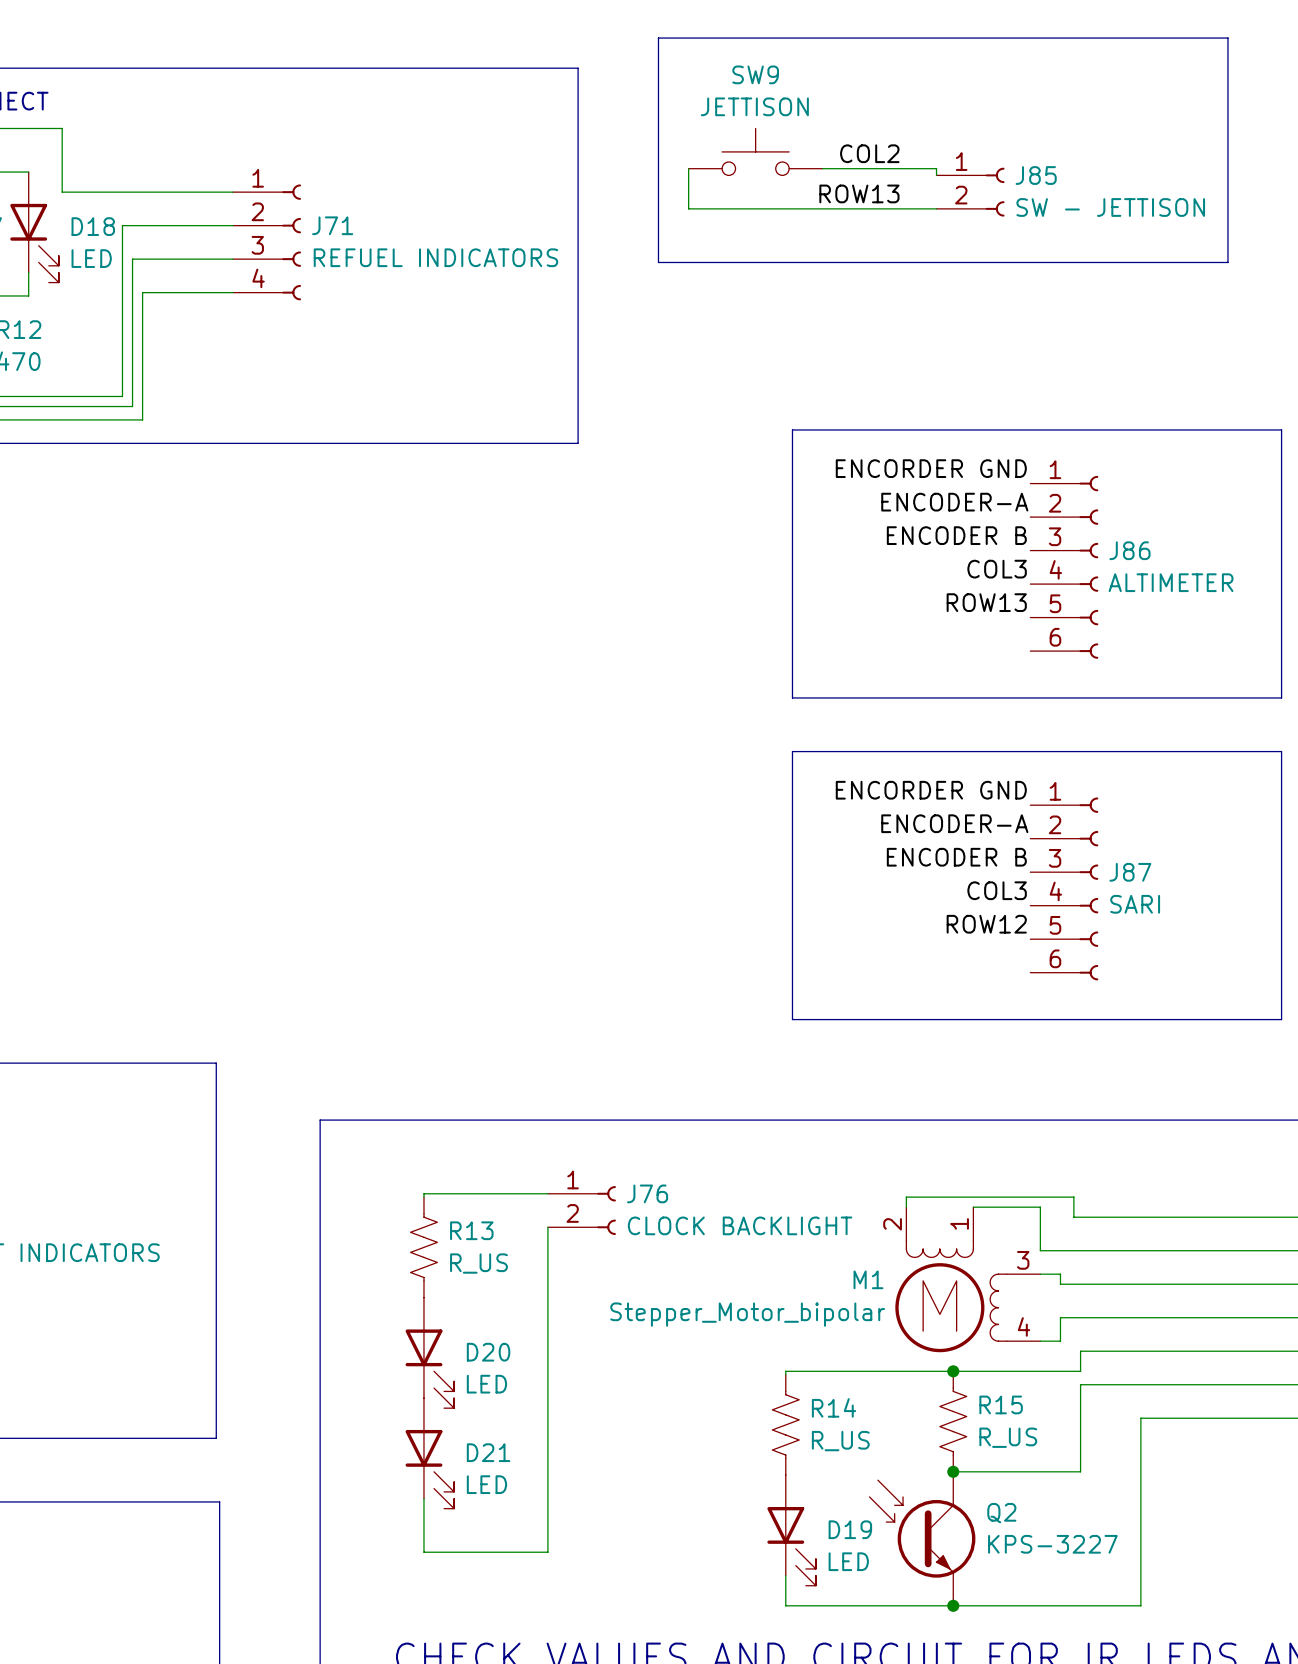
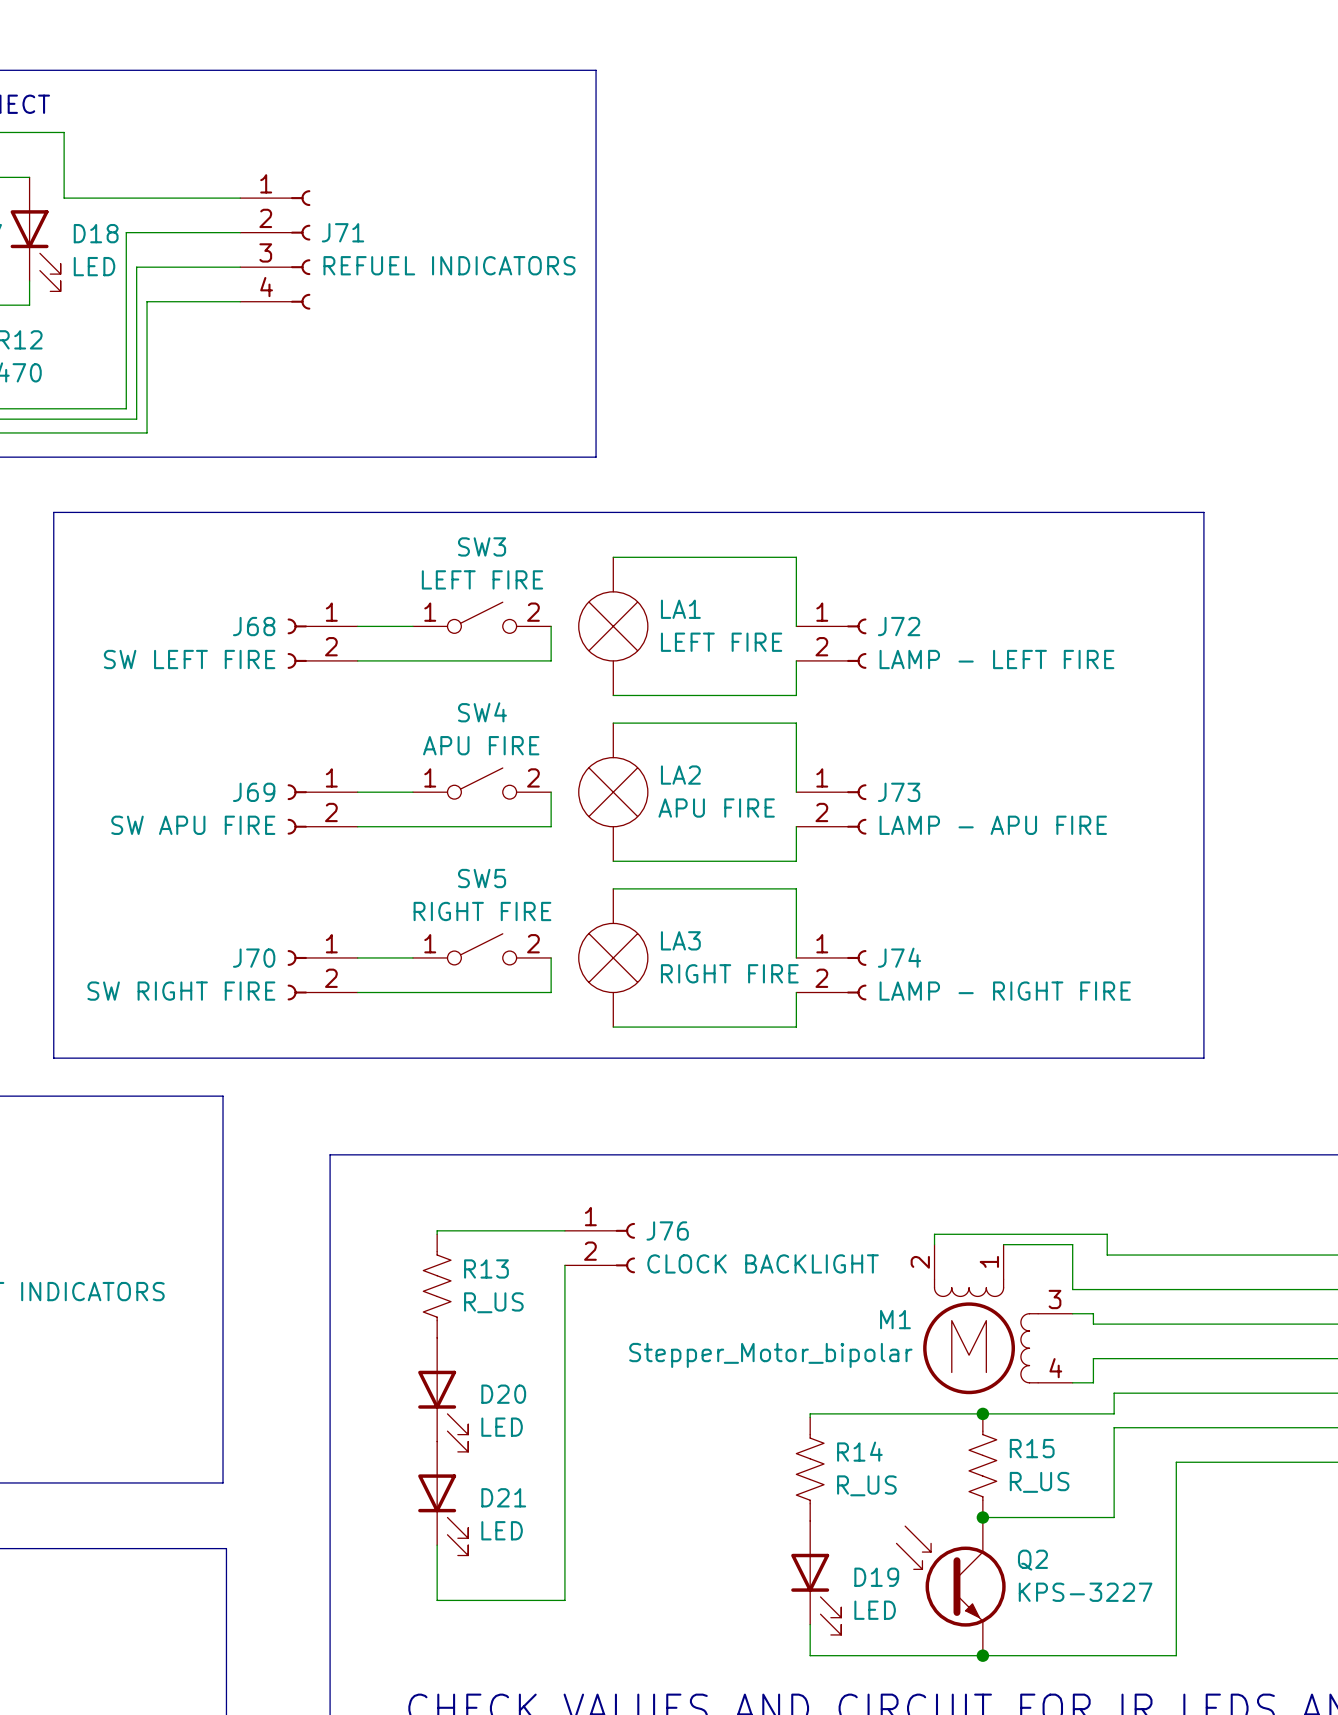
line: (658, 38) (1227, 38) (1227, 262) (658, 262) (658, 38) -> none
SW9: JETTISON (755, 151) -> none
label: COL2 (869, 153) -> none
wire: (688, 168) (688, 208) (936, 208) -> none
wire: (822, 168) (936, 168) (936, 175) -> none
J85: SW - JETTISON (970, 192) -> none
label: ROW13 (859, 193) -> none
line: (792, 429) (792, 697) (1281, 697) (1281, 429) (792, 429) -> none
label: ENCORDER GND (931, 468) -> none
line: none -> (53, 512) (1203, 512) (1203, 1058) (53, 1058) (53, 512)
label: ENCODER-A (954, 502) -> none
label: ENCODER B (956, 535) -> none
wire: none -> (613, 557) (796, 557) (796, 626)
J86: ALTIMETER (1064, 567) -> none
label: COL3 (997, 569) -> none
SW3: none -> LEFT FIRE (482, 617)
label: ROW13 (986, 602) -> none
wire: none -> (357, 626) (412, 626)
wire: none -> (551, 626) (551, 660) (357, 660)
LA1: none -> LEFT FIRE (613, 626)
J68: none -> SW LEFT FIRE (322, 643)
J72: none -> LAMP - LEFT FIRE (831, 643)
wire: none -> (796, 660) (796, 695) (613, 695)
wire: none -> (613, 723) (796, 723) (796, 792)
line: (792, 751) (1281, 751) (1281, 1019) (792, 1019) (792, 751) -> none
SW4: none -> APU FIRE (482, 783)
wire: none -> (357, 792) (412, 792)
wire: none -> (551, 792) (551, 826) (357, 826)
LA2: none -> APU FIRE (613, 792)
J69: none -> SW APU FIRE (322, 809)
J73: none -> LAMP - APU FIRE (831, 809)
label: ENCORDER GND (931, 790) -> none
wire: none -> (796, 826) (796, 861) (613, 861)
label: ENCODER-A (954, 823) -> none
label: ENCODER B (956, 857) -> none
wire: none -> (613, 888) (796, 888) (796, 957)
J87: SARI (1064, 888) -> none
label: COL3 (997, 890) -> none
SW5: none -> RIGHT FIRE (482, 949)
label: ROW12 (986, 924) -> none
wire: none -> (357, 957) (412, 957)
wire: none -> (551, 957) (551, 992) (357, 992)
LA3: none -> RIGHT FIRE (613, 957)
J70: none -> SW RIGHT FIRE (322, 975)
J74: none -> LAMP - RIGHT FIRE (831, 975)
wire: none -> (796, 992) (796, 1027) (613, 1027)

